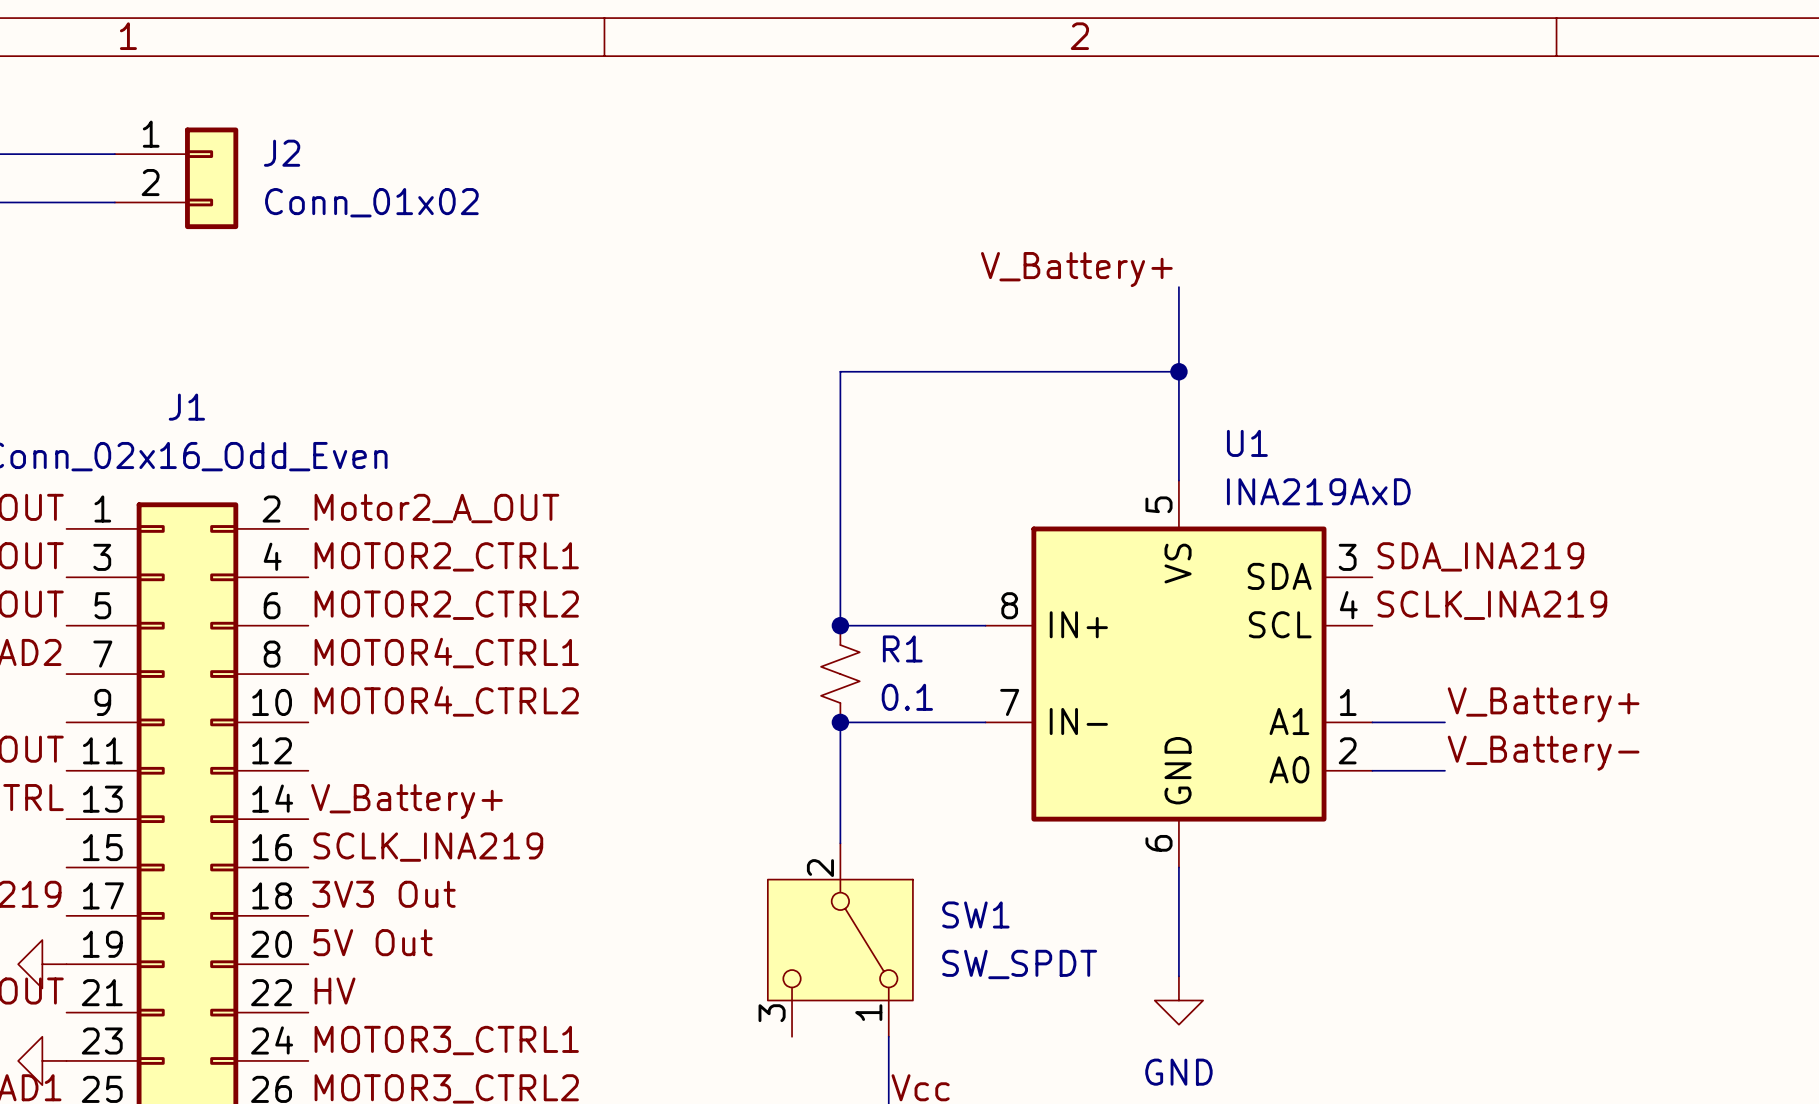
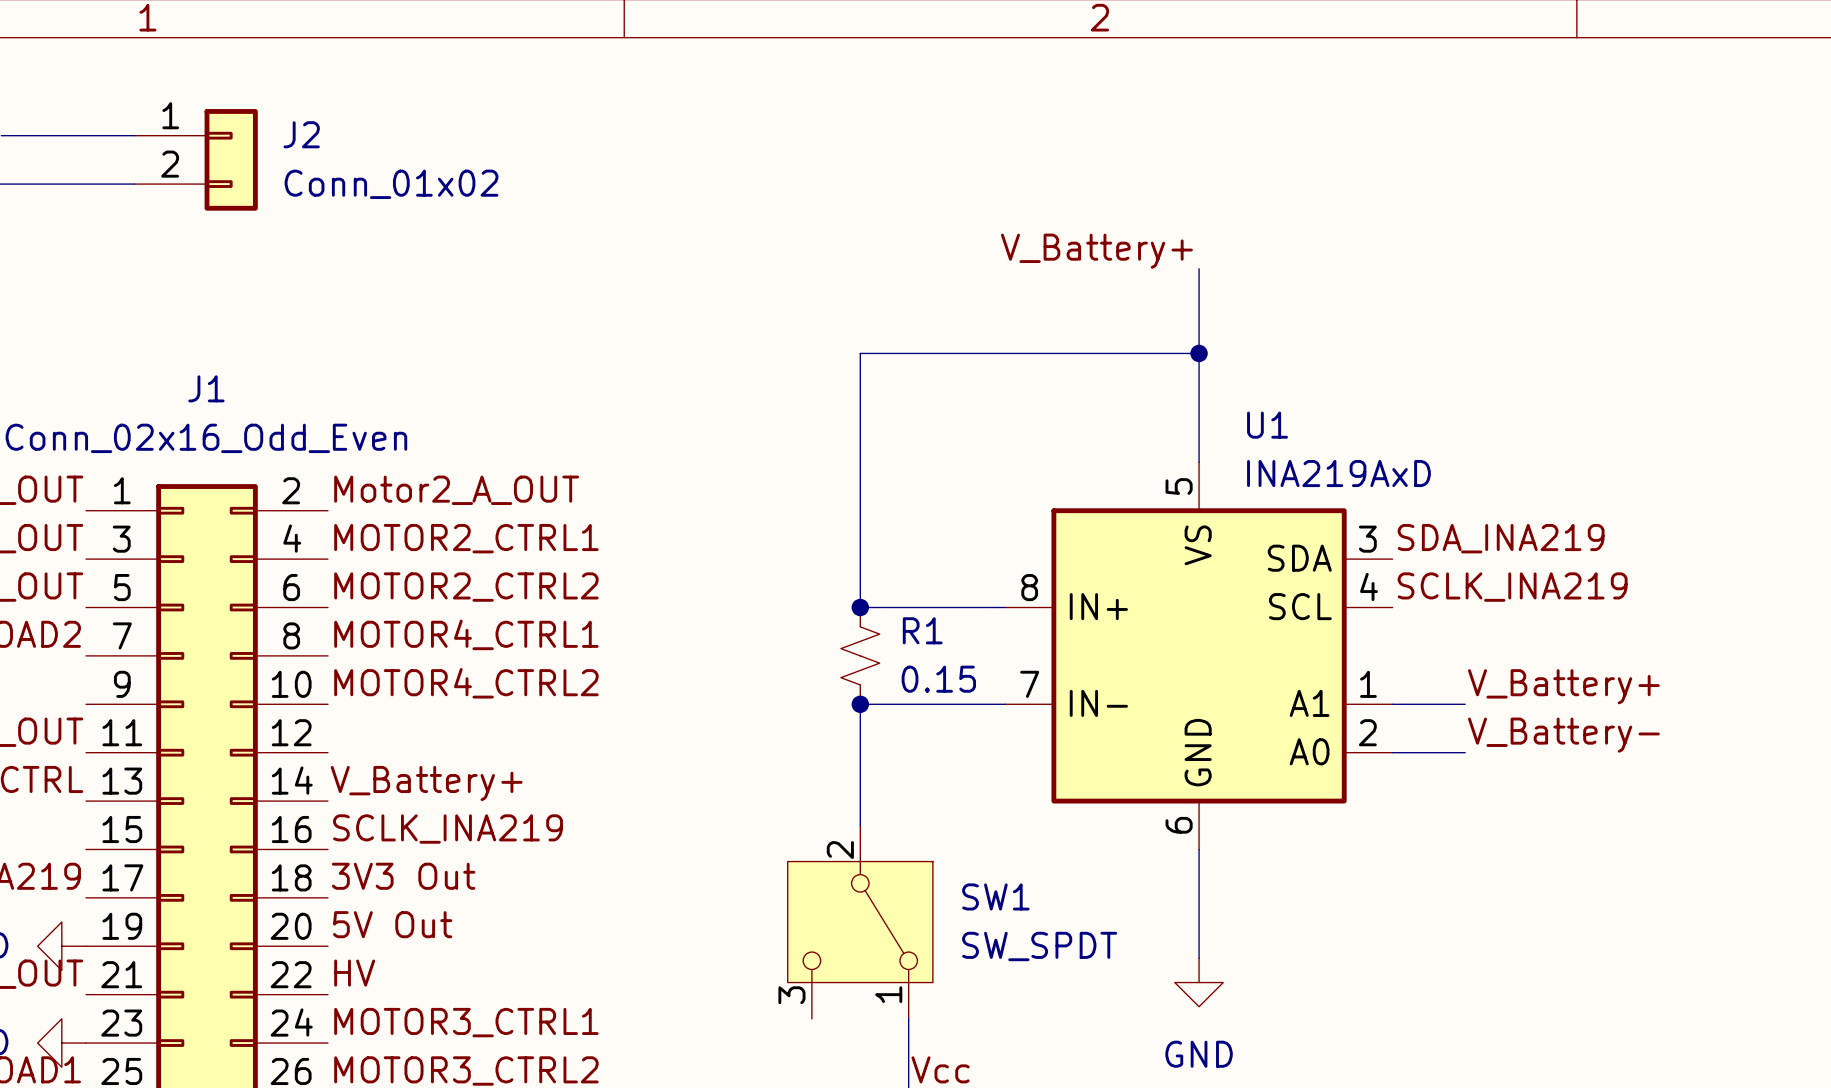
R1 value: 0.1 (907, 697) -> 0.15 (938, 679)

